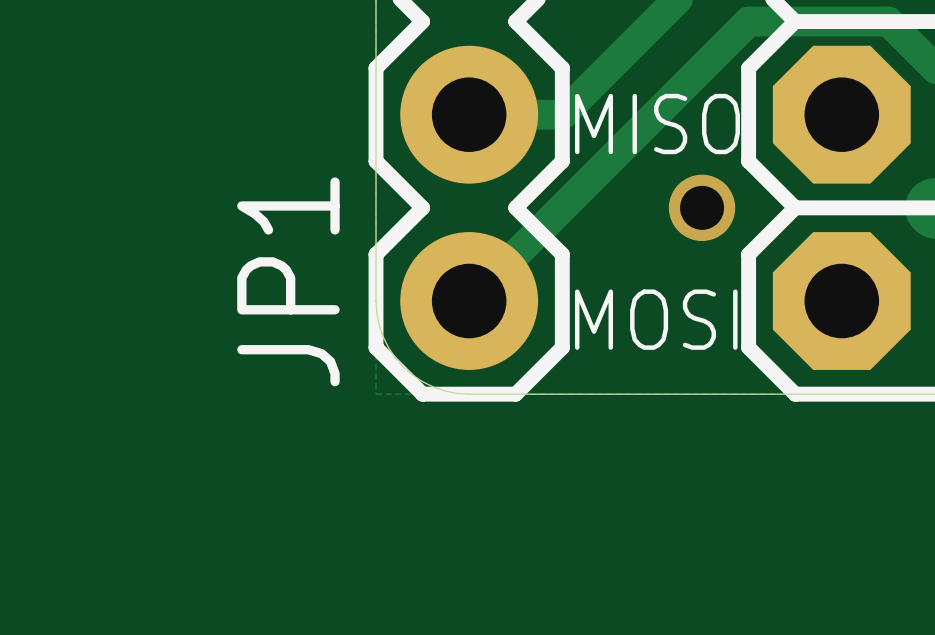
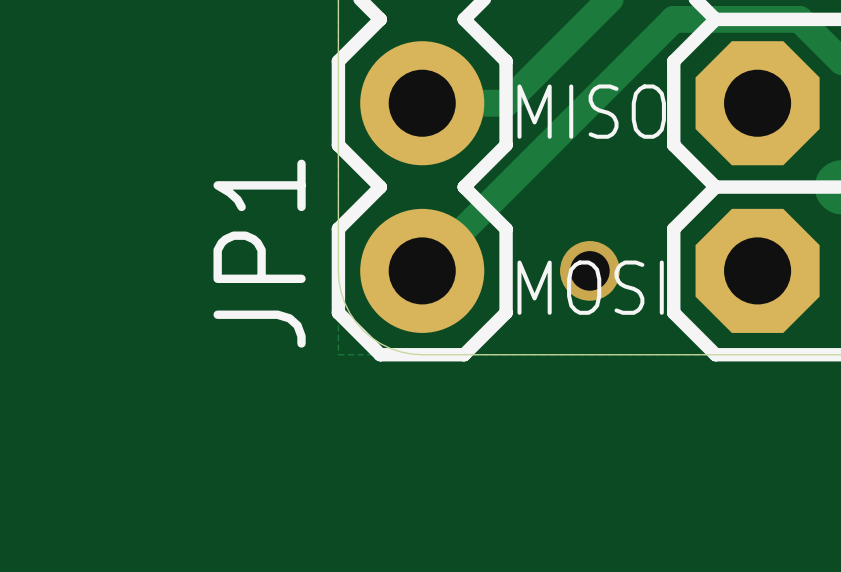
via position: (702, 207) -> (589, 270)

